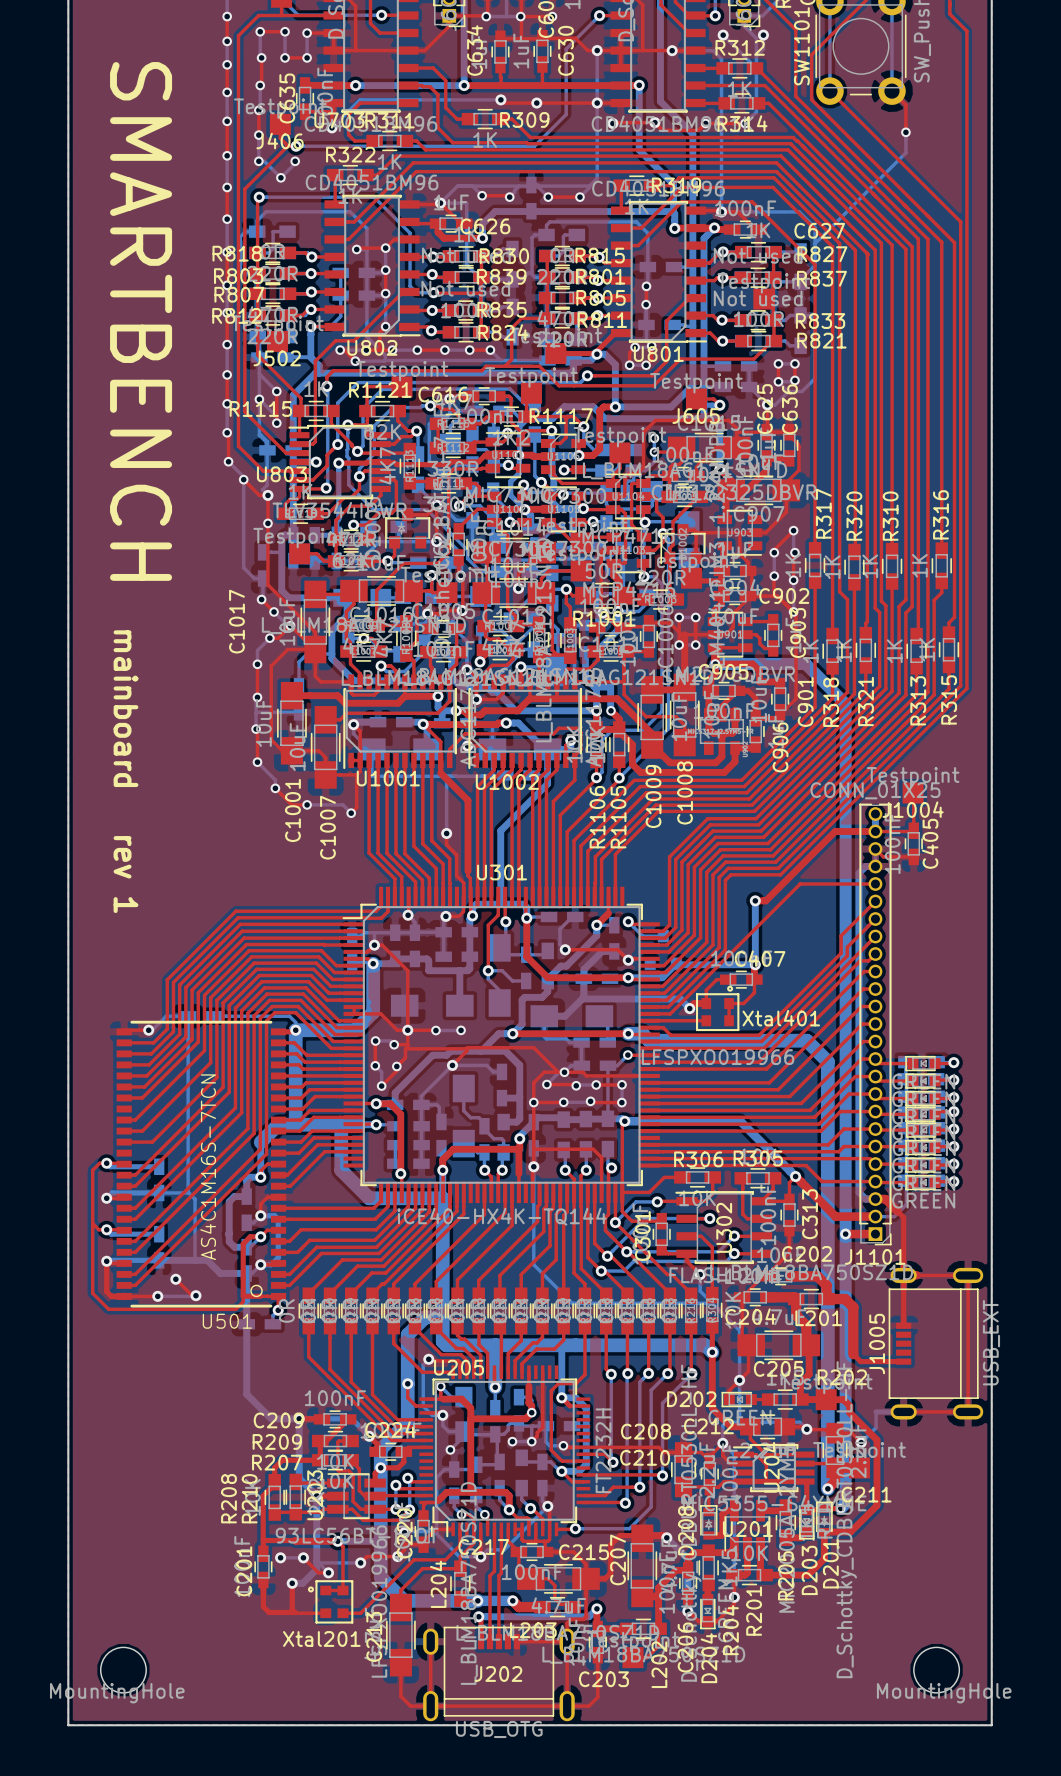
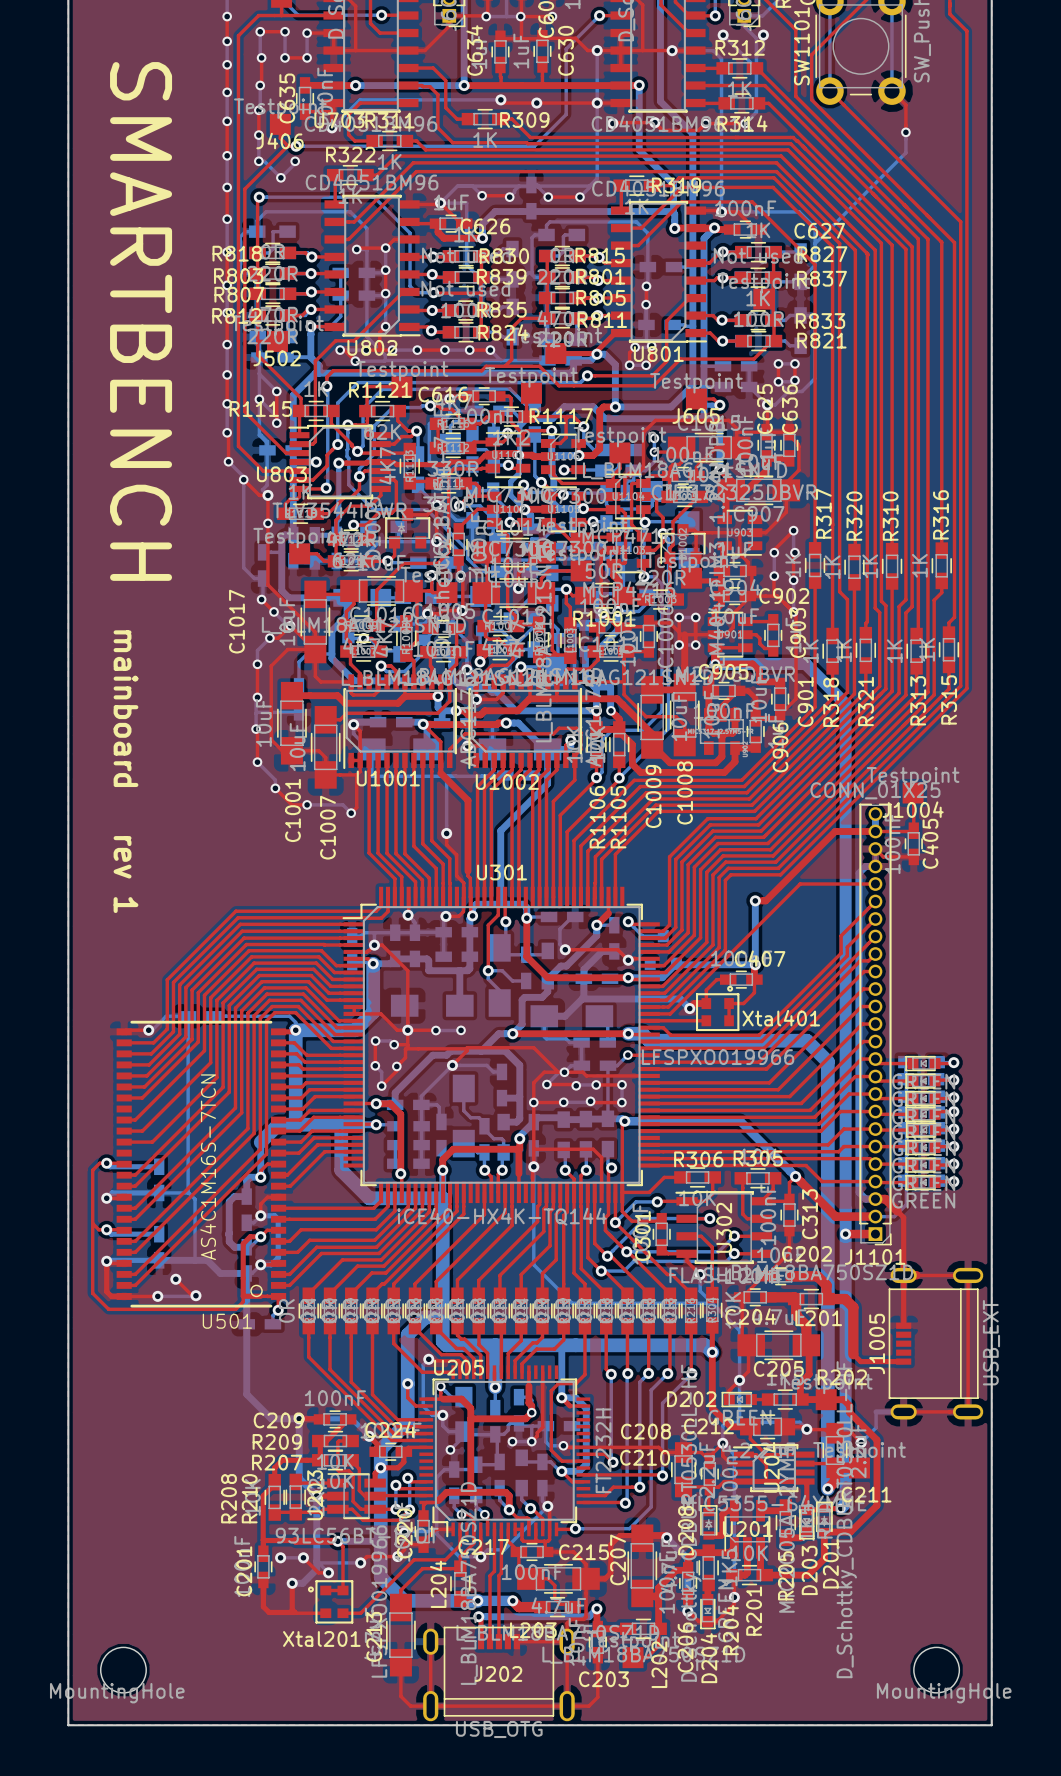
R833 value: Not used (758, 298) -> 1K (758, 298)

